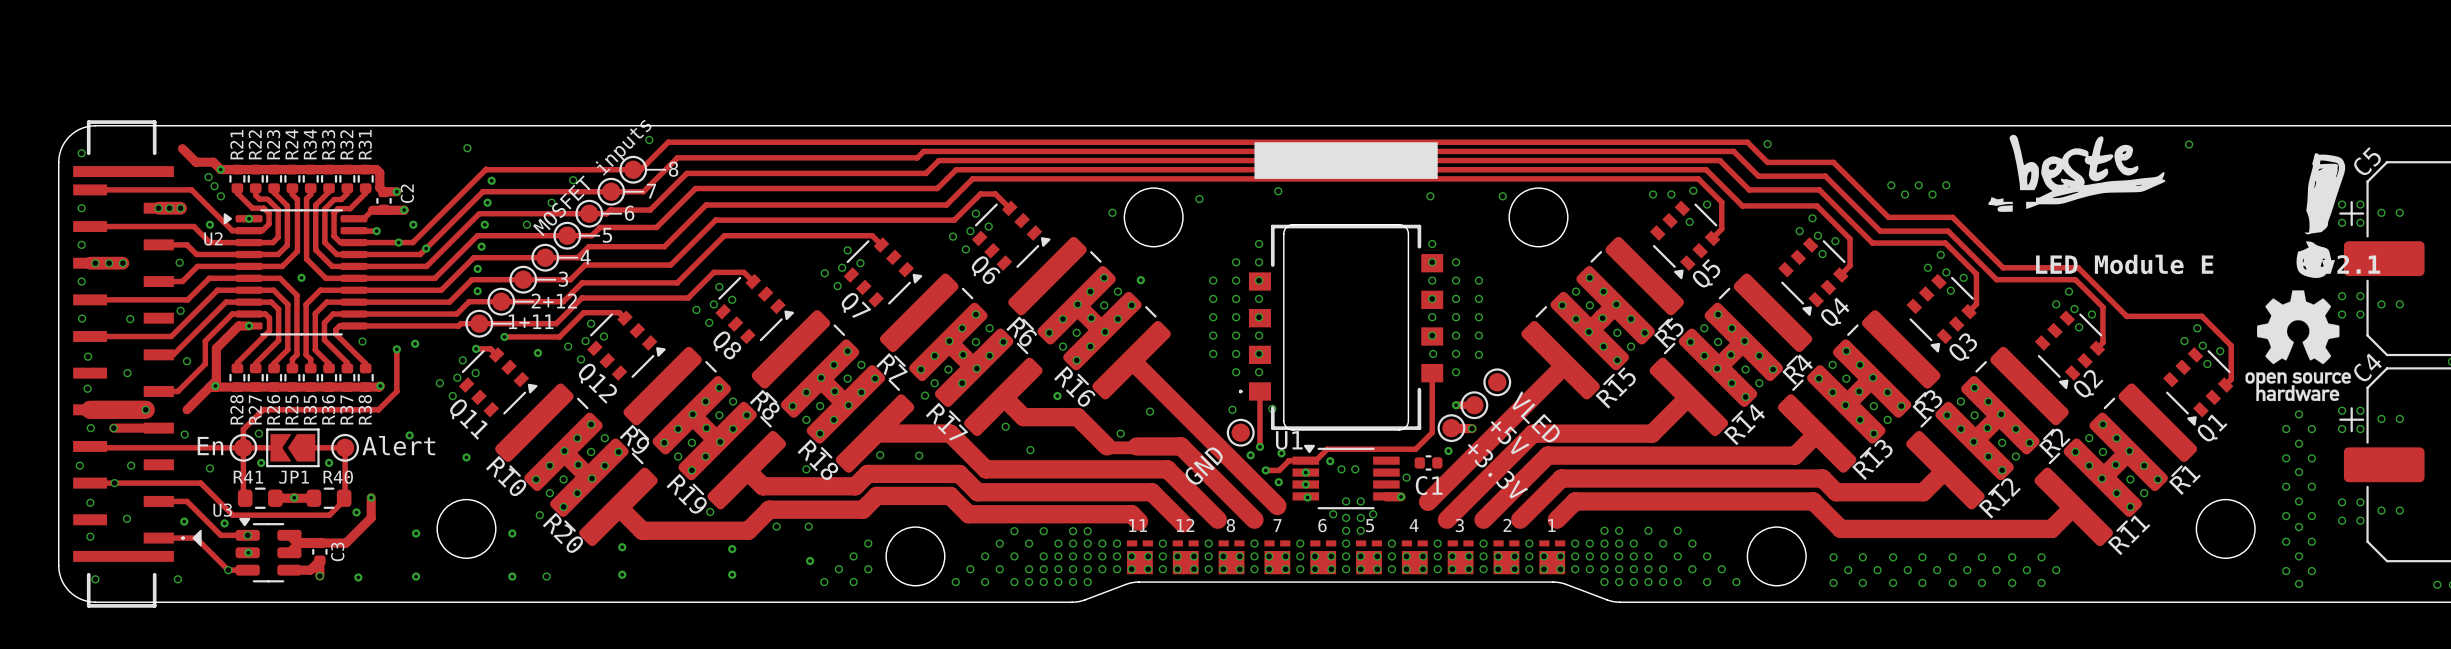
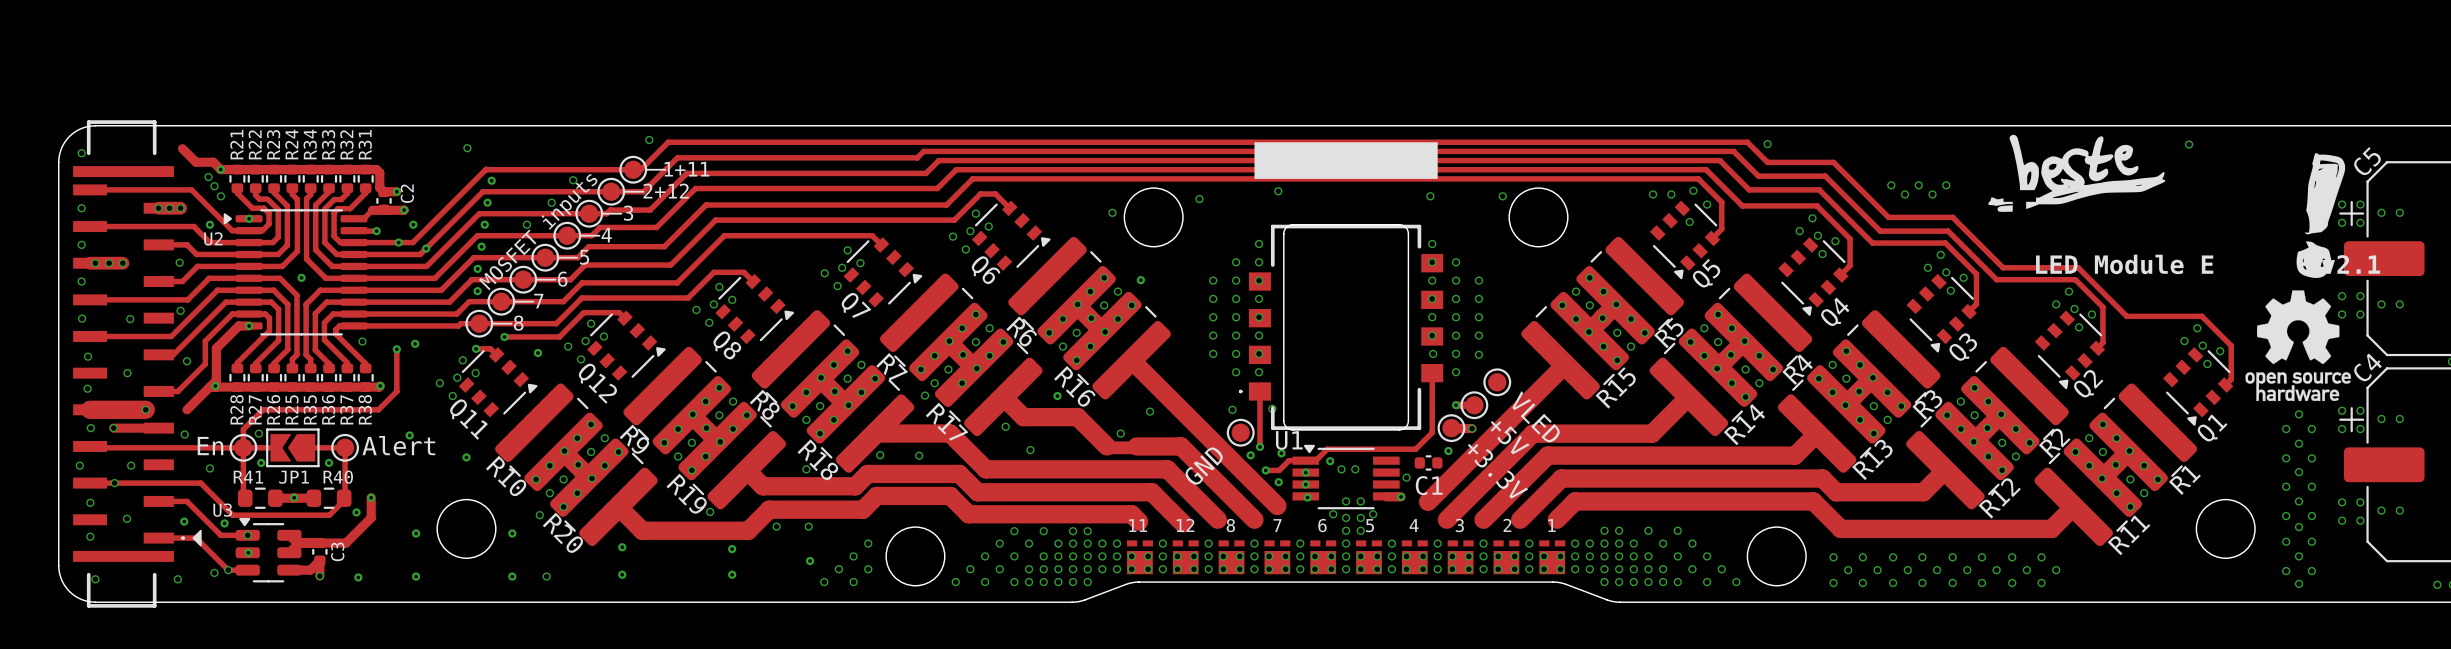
text position: 8 (673, 169) -> 8 (518, 323)
text position: MOSFET inputs (592, 178) -> MOSFET inputs (538, 232)
text position: 7 (651, 191) -> 7 (538, 301)
text: 6 (629, 213) -> 3 (628, 213)
text: 5 (607, 235) -> 4 (606, 235)
text: 4 (585, 257) -> 5 (584, 257)
text: 3 (563, 279) -> 6 (562, 279)
text position: 2+12 (554, 301) -> 2+12 (666, 191)
text position: 1+11 (531, 321) -> 1+11 (686, 169)
via: none -> (214, 572)

